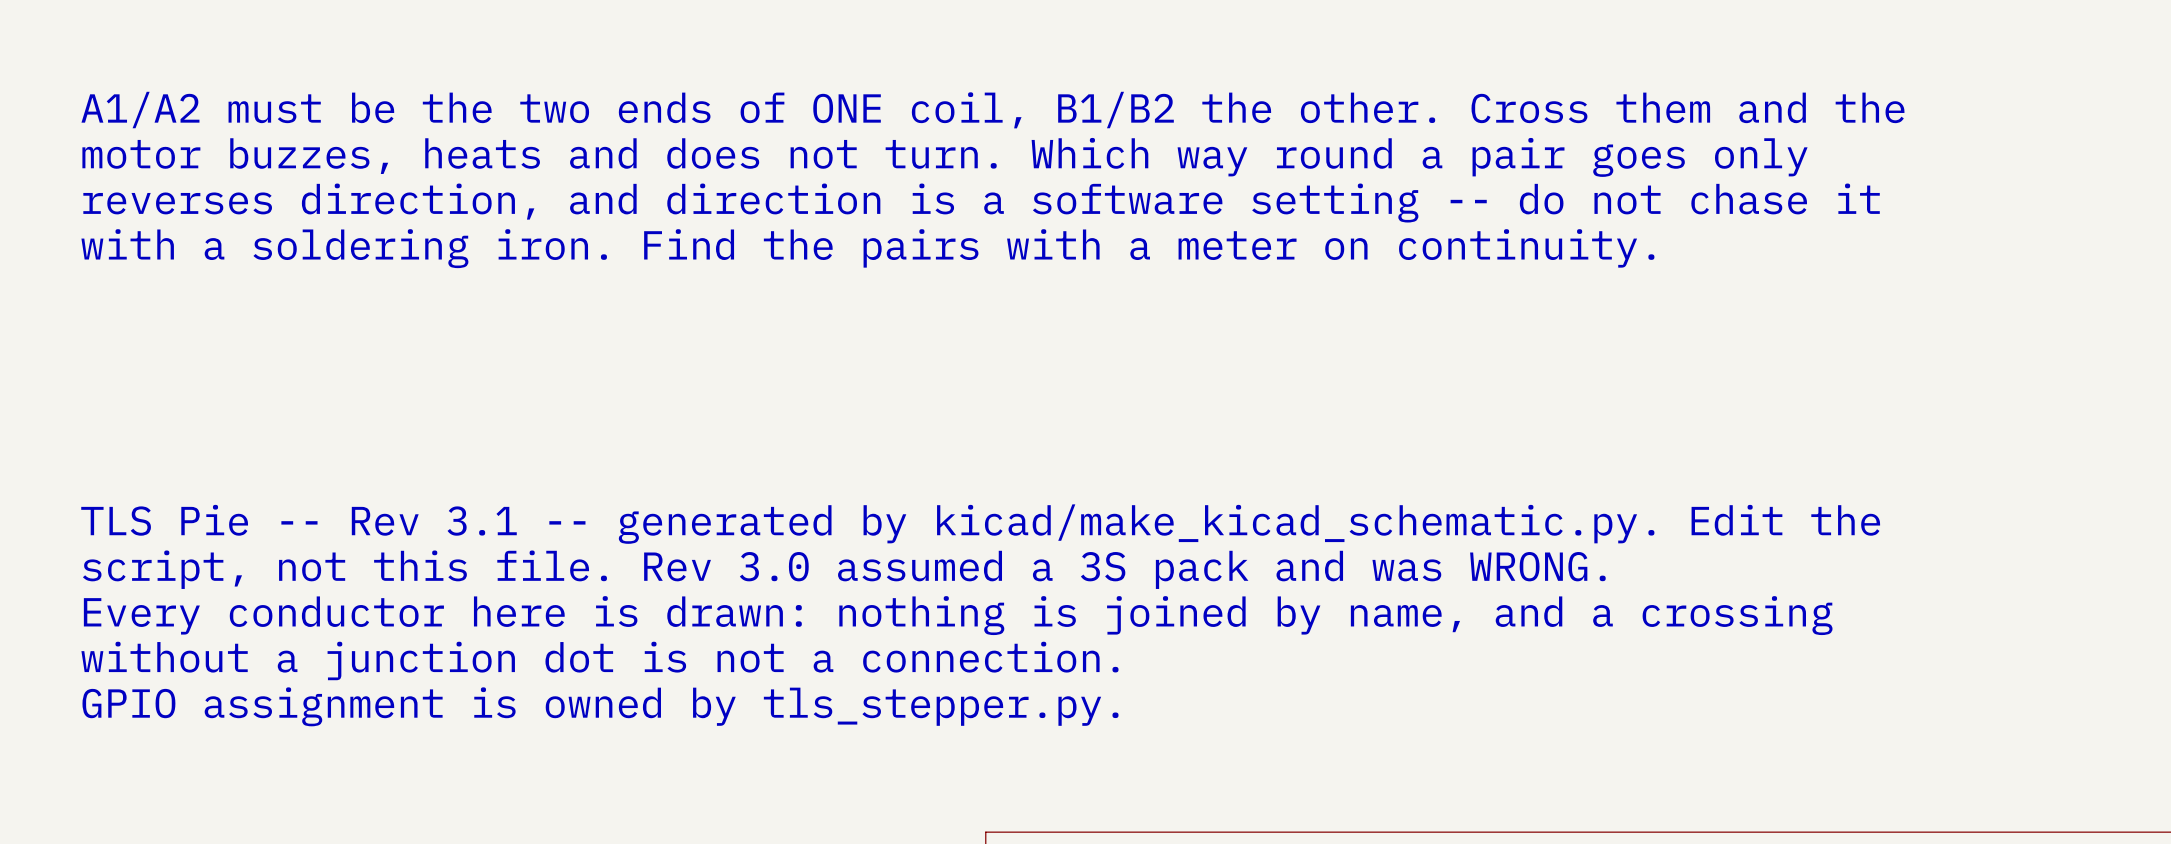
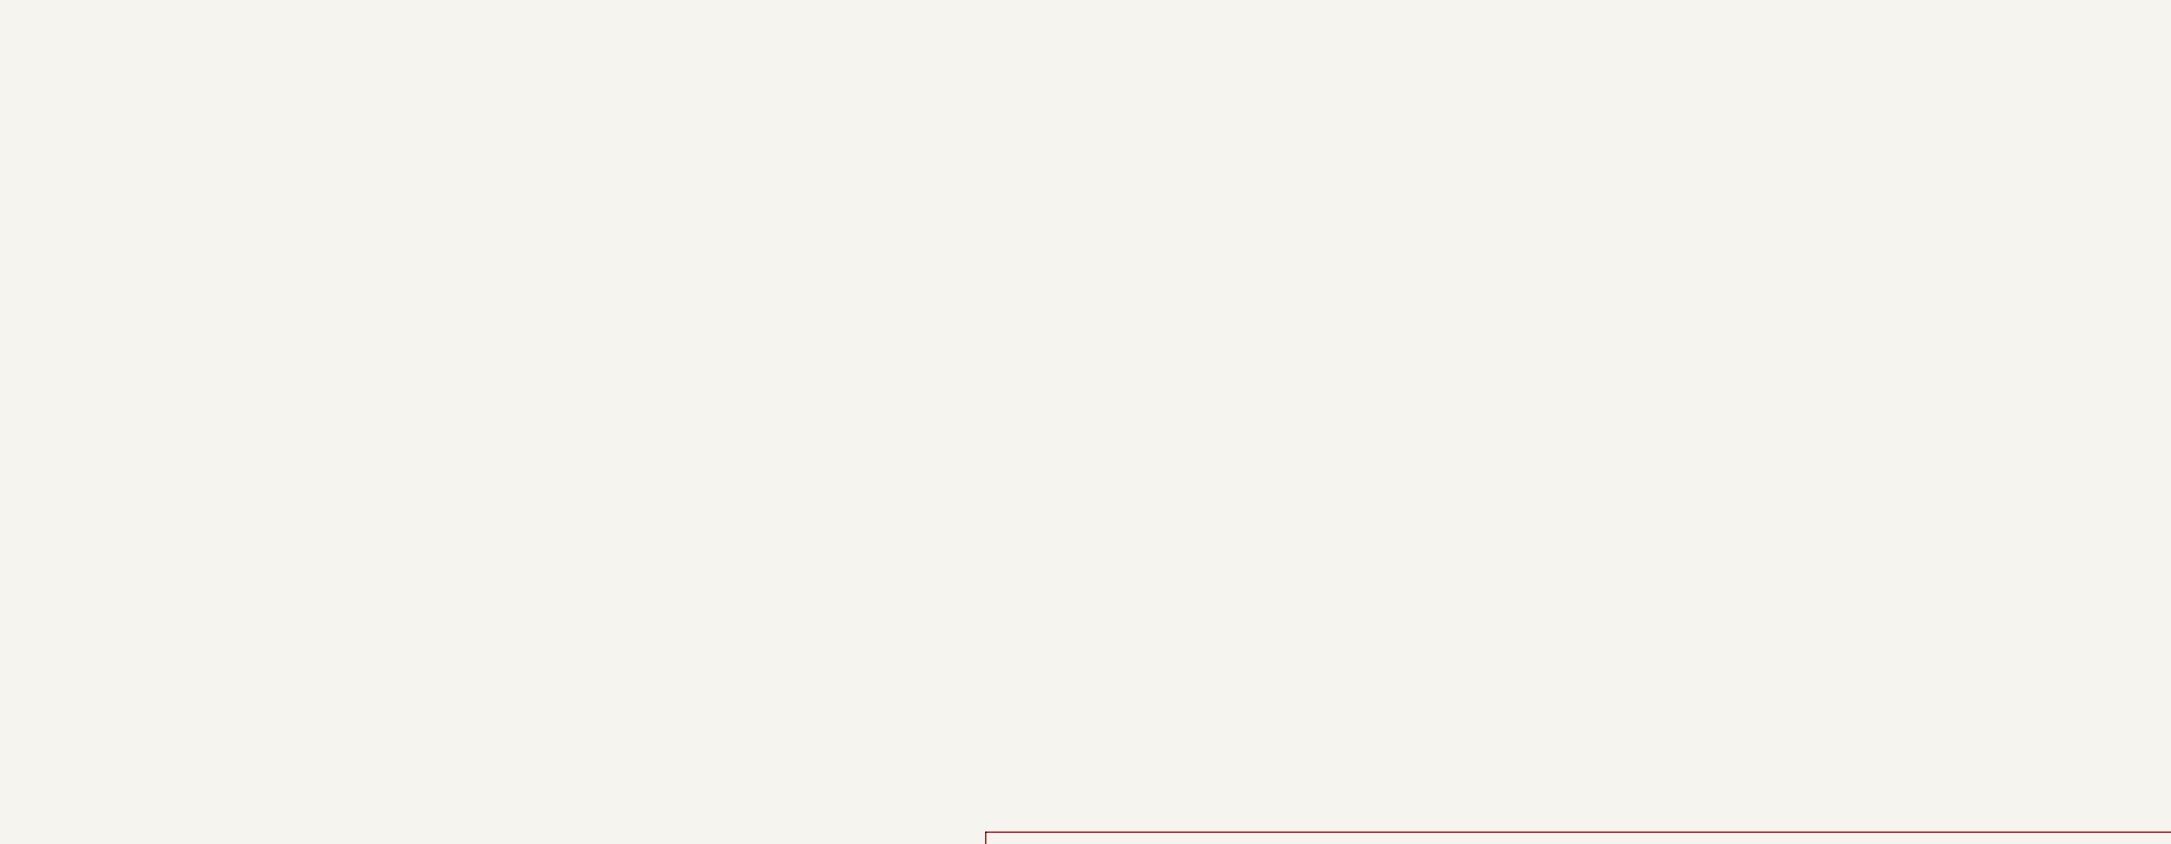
text: A1/A2 must be the two ends of ONE coil, B1/B2 the other. Cross them and the (992, 110) -> none
text: motor buzzes, heats and does not turn. Which way round a pair goes only (944, 157) -> none
text: reverses direction, and direction is a software setting -- do not chase it (981, 203) -> none
text: with a soldering iron. Find the pairs with a meter on continuity. (867, 248) -> none
text: TLS Pie -- Rev 3.1 -- generated by kicad/make_kicad_schematic.py. Edit the (980, 524) -> none
text: script, not this file. Rev 3.0 assumed a 3S pack and was WRONG. (844, 569) -> none
text: Every conductor here is drawn: nothing is joined by name, and a crossing (958, 615) -> none
text: without a junction dot is not a connection. (599, 660) -> none
text: GPIO assignment is owned by tls_stepper.py. (600, 706) -> none

